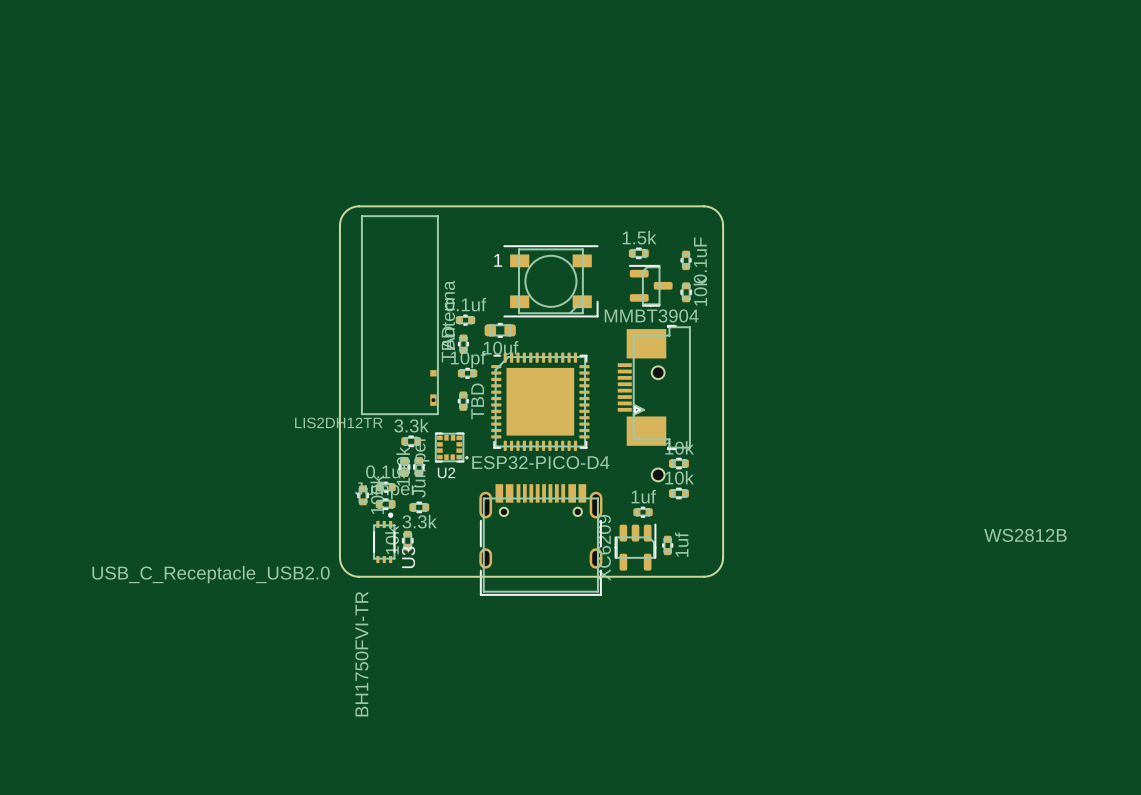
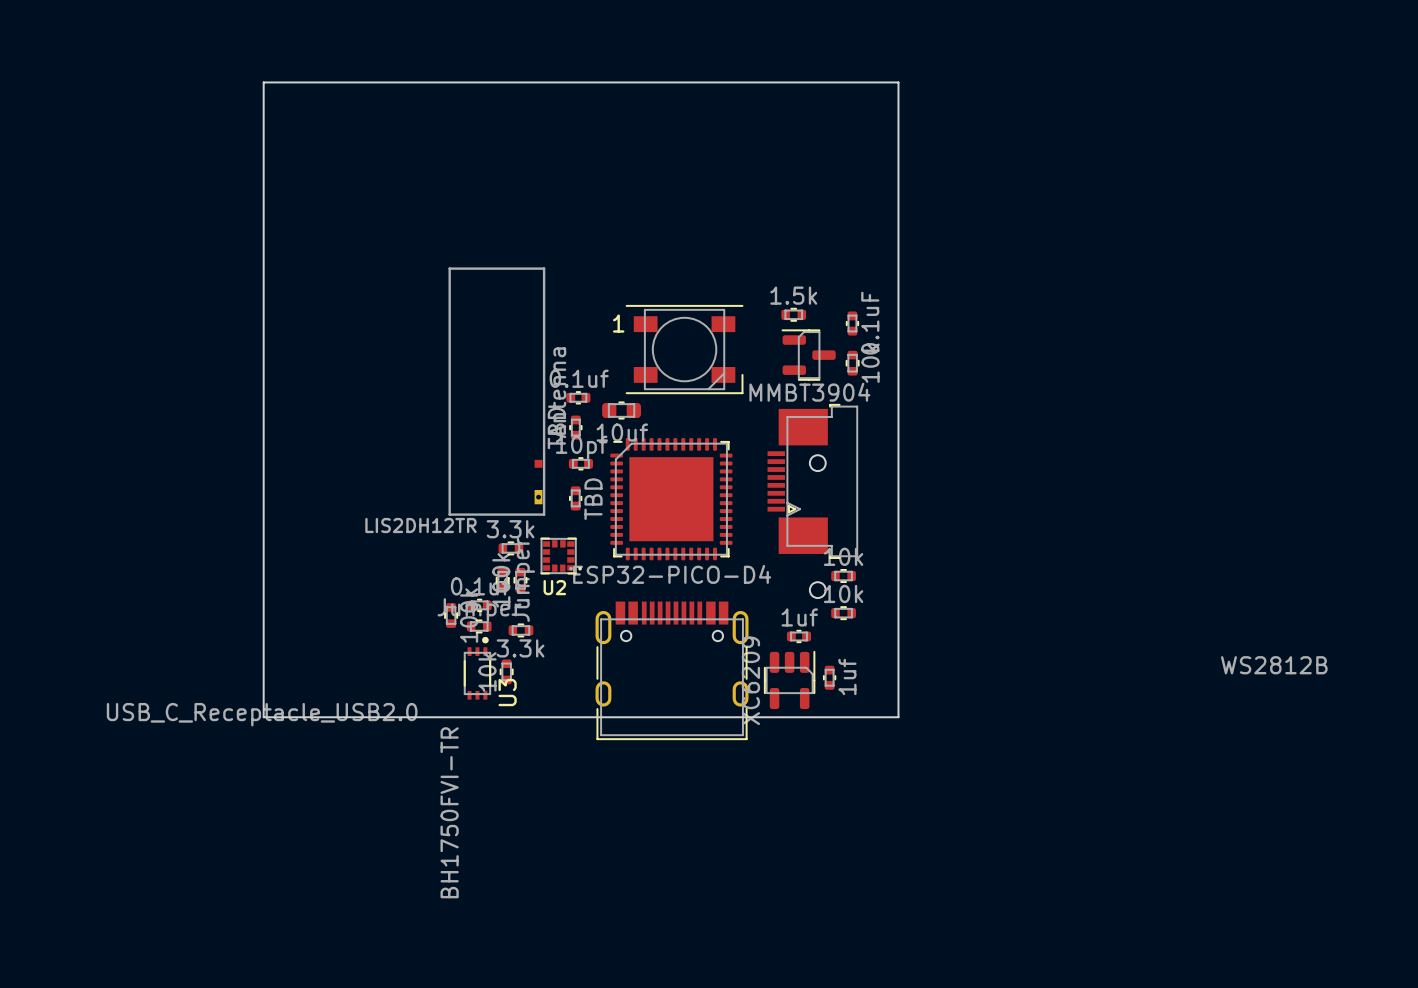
board edge: (723, 225) (717, 211) (703, 206) (359, 206) (345, 211) (339, 225) (339, 557) (341, 564) (347, 572) (359, 576) (703, 576) (717, 571) (723, 557) -> (898, 280) (898, 82) (263, 82) (263, 717) (898, 717) (898, 692)

